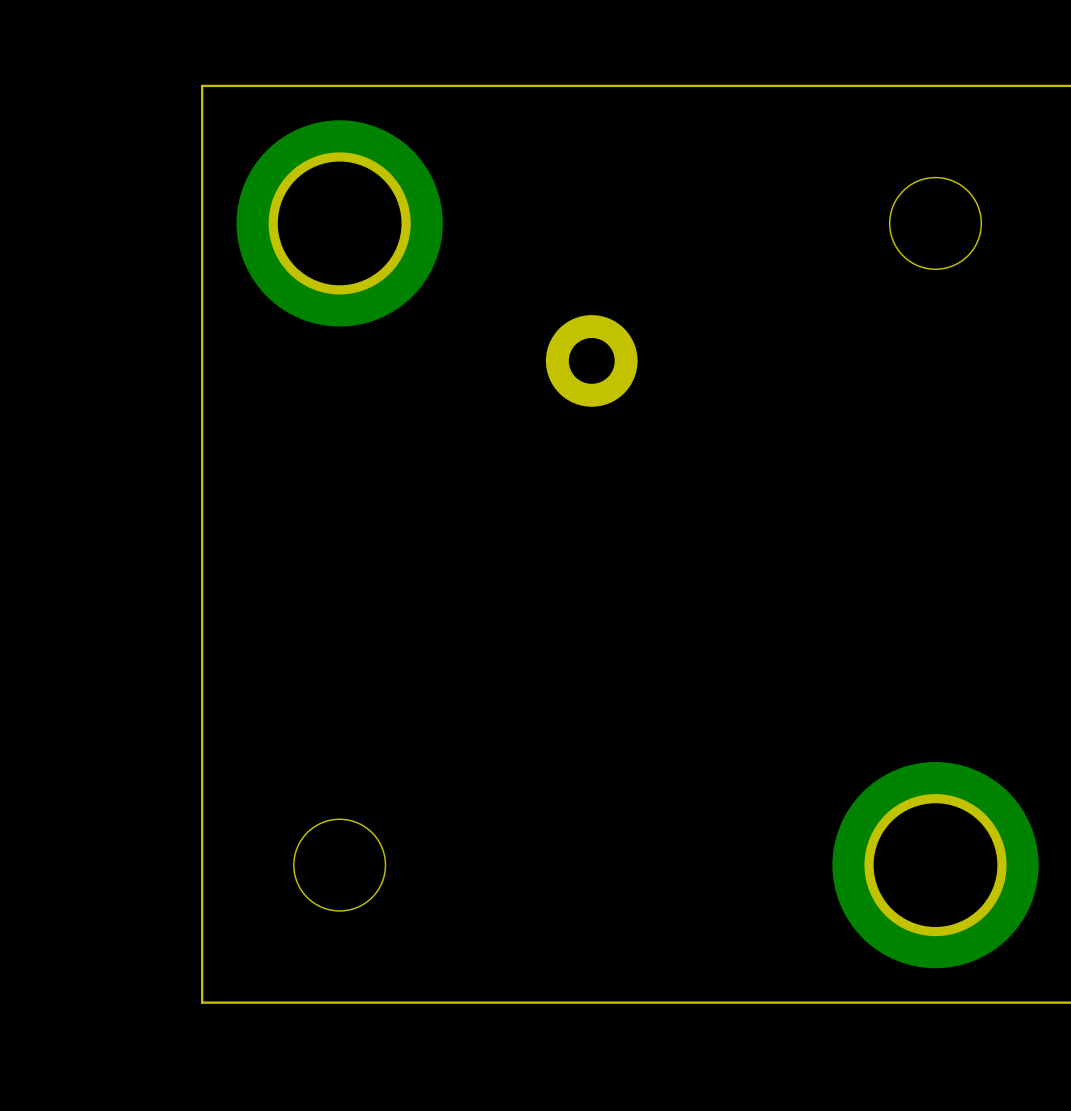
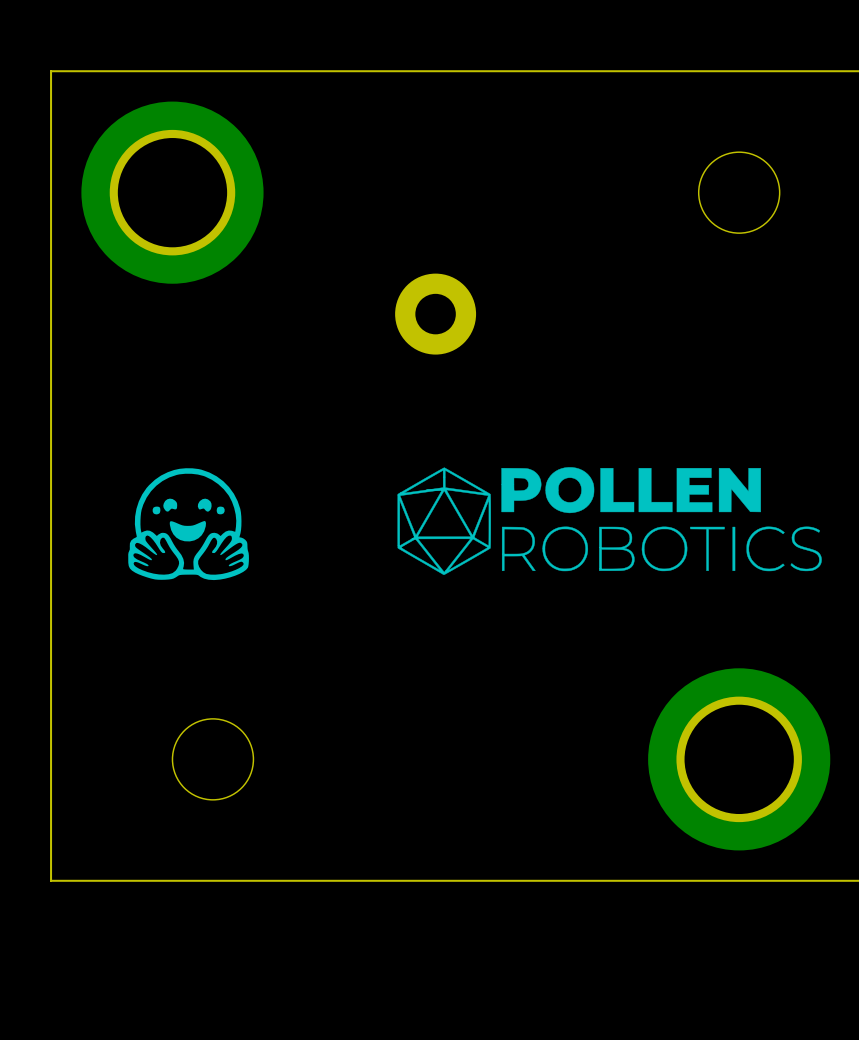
board edge: (202, 85) (202, 1002) -> (91, 71) (51, 71) (51, 880) (91, 880)
part position: (339, 223) -> (172, 192)
drawing: none -> [397, 467, 822, 575]
drawing: none -> [128, 468, 249, 581]

